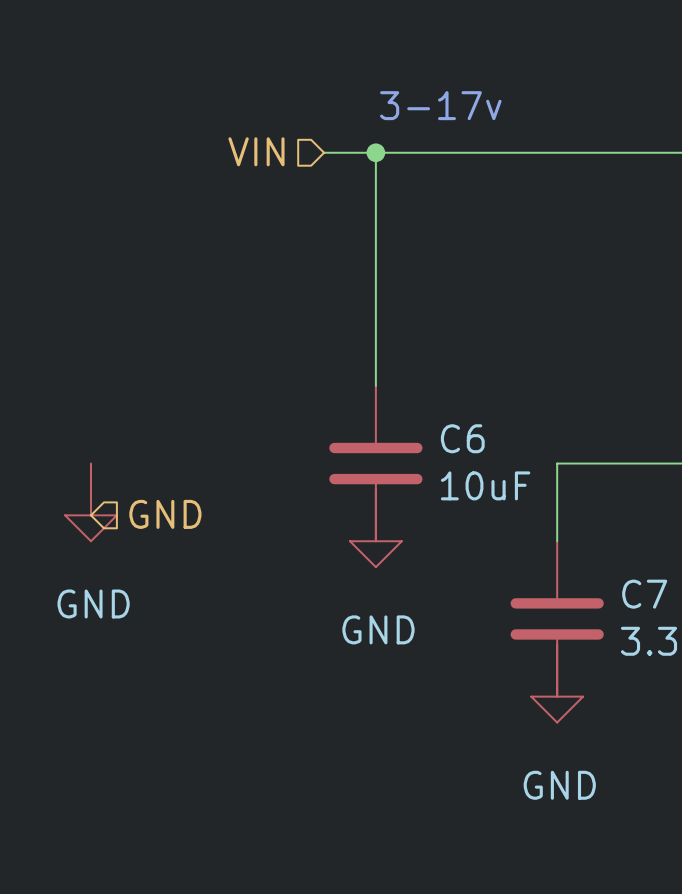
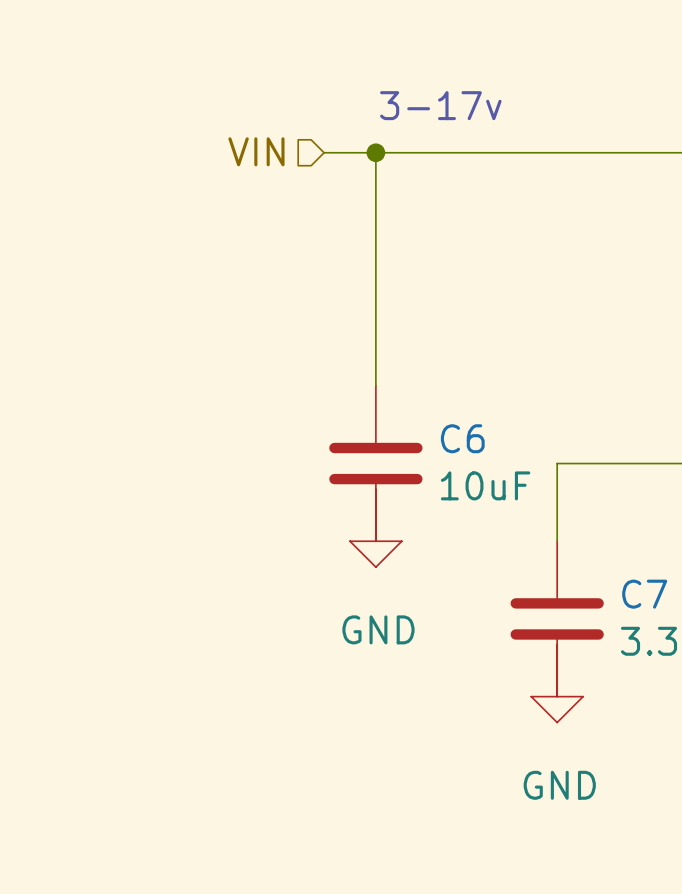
power symbol: GND (91, 502) -> none
hierarchical label: GND (165, 514) -> none

